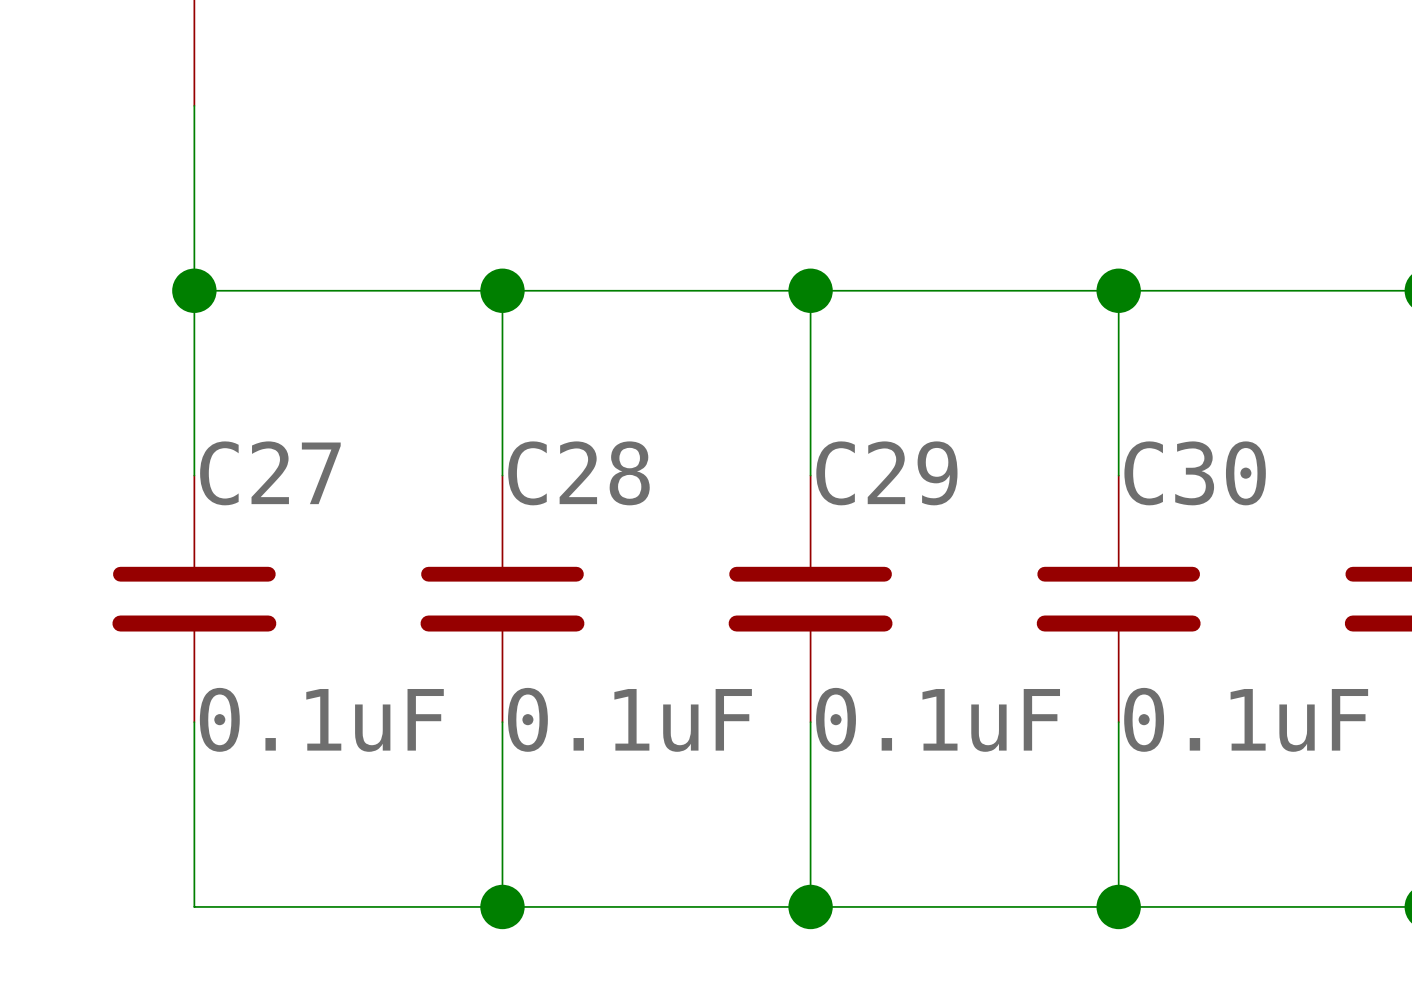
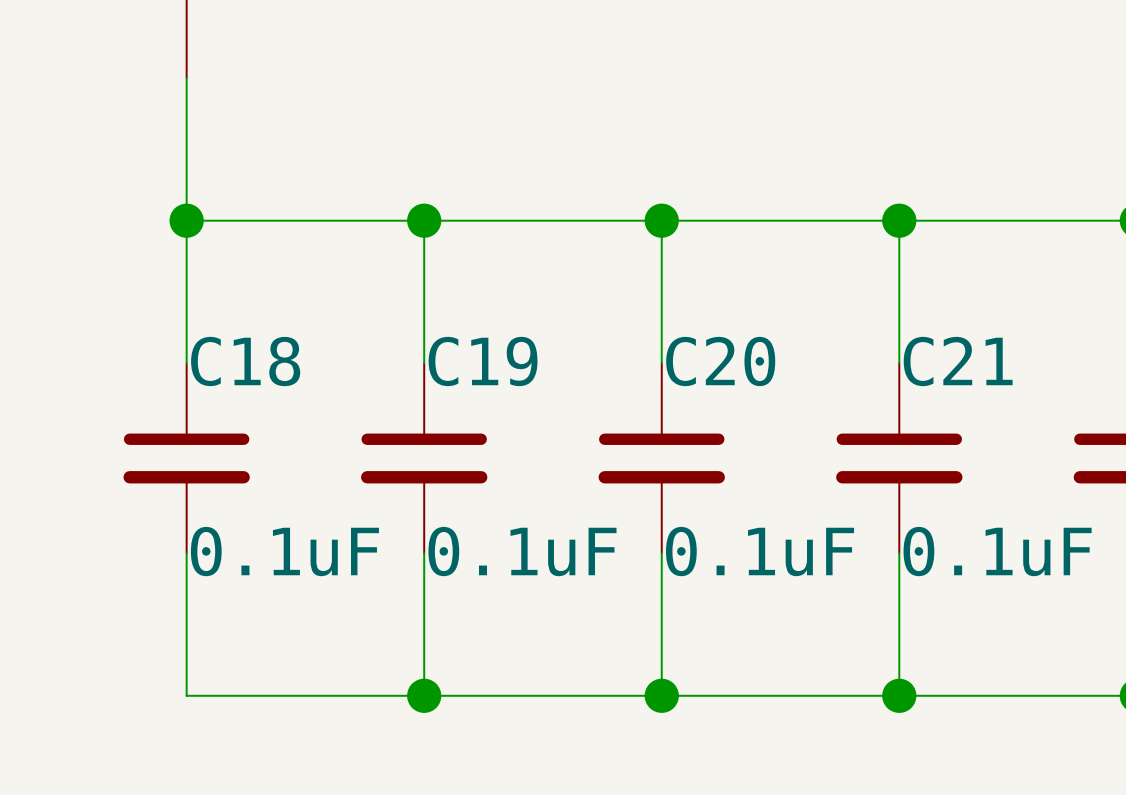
C27 name: C27 (270, 473) -> C18 (245, 361)
C28 name: C28 (578, 473) -> C19 (483, 361)
C29 name: C29 (886, 473) -> C20 (720, 361)
C30 name: C30 (1195, 473) -> C21 (958, 361)

